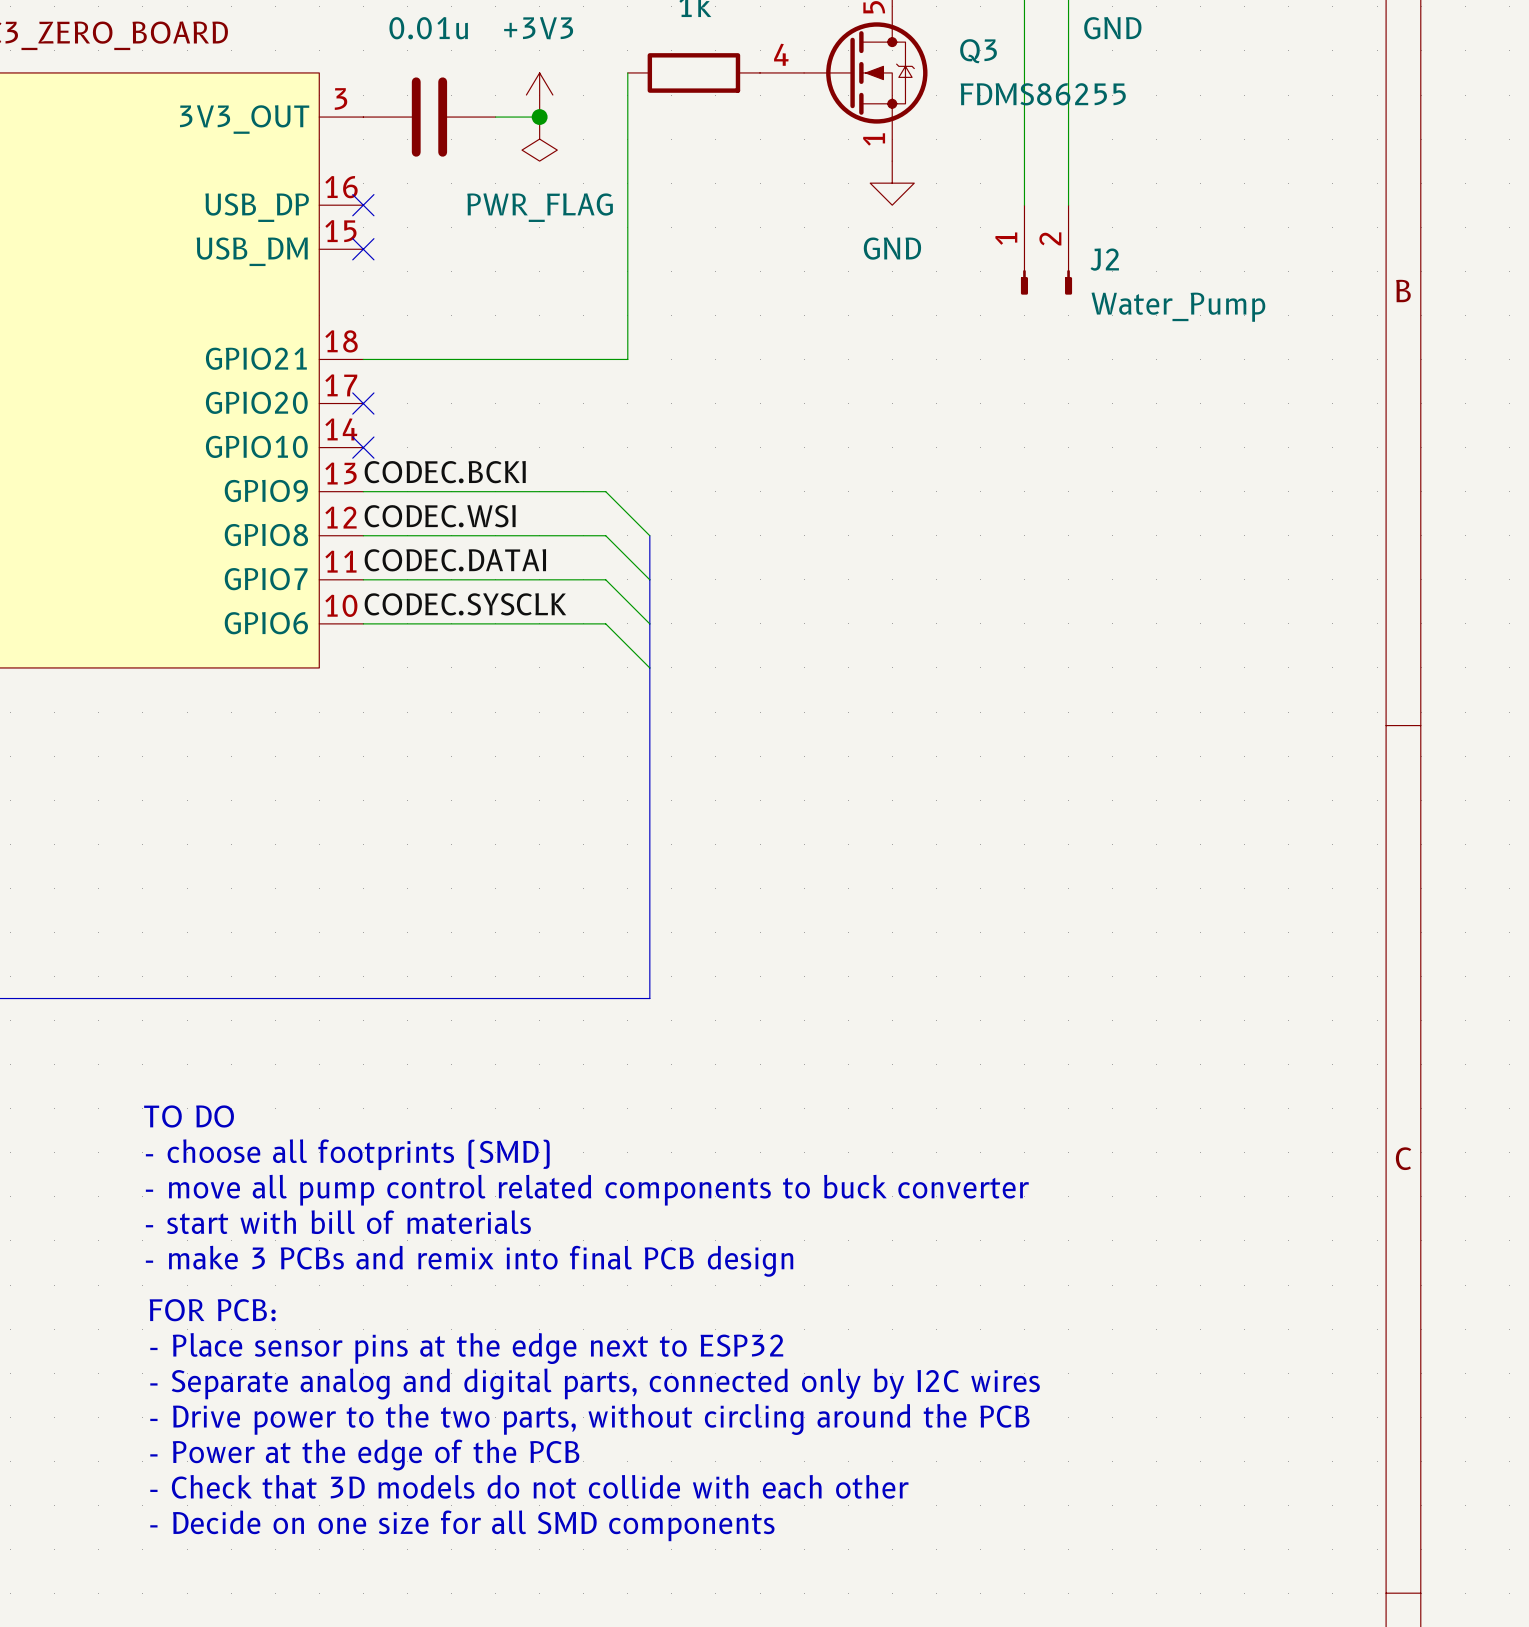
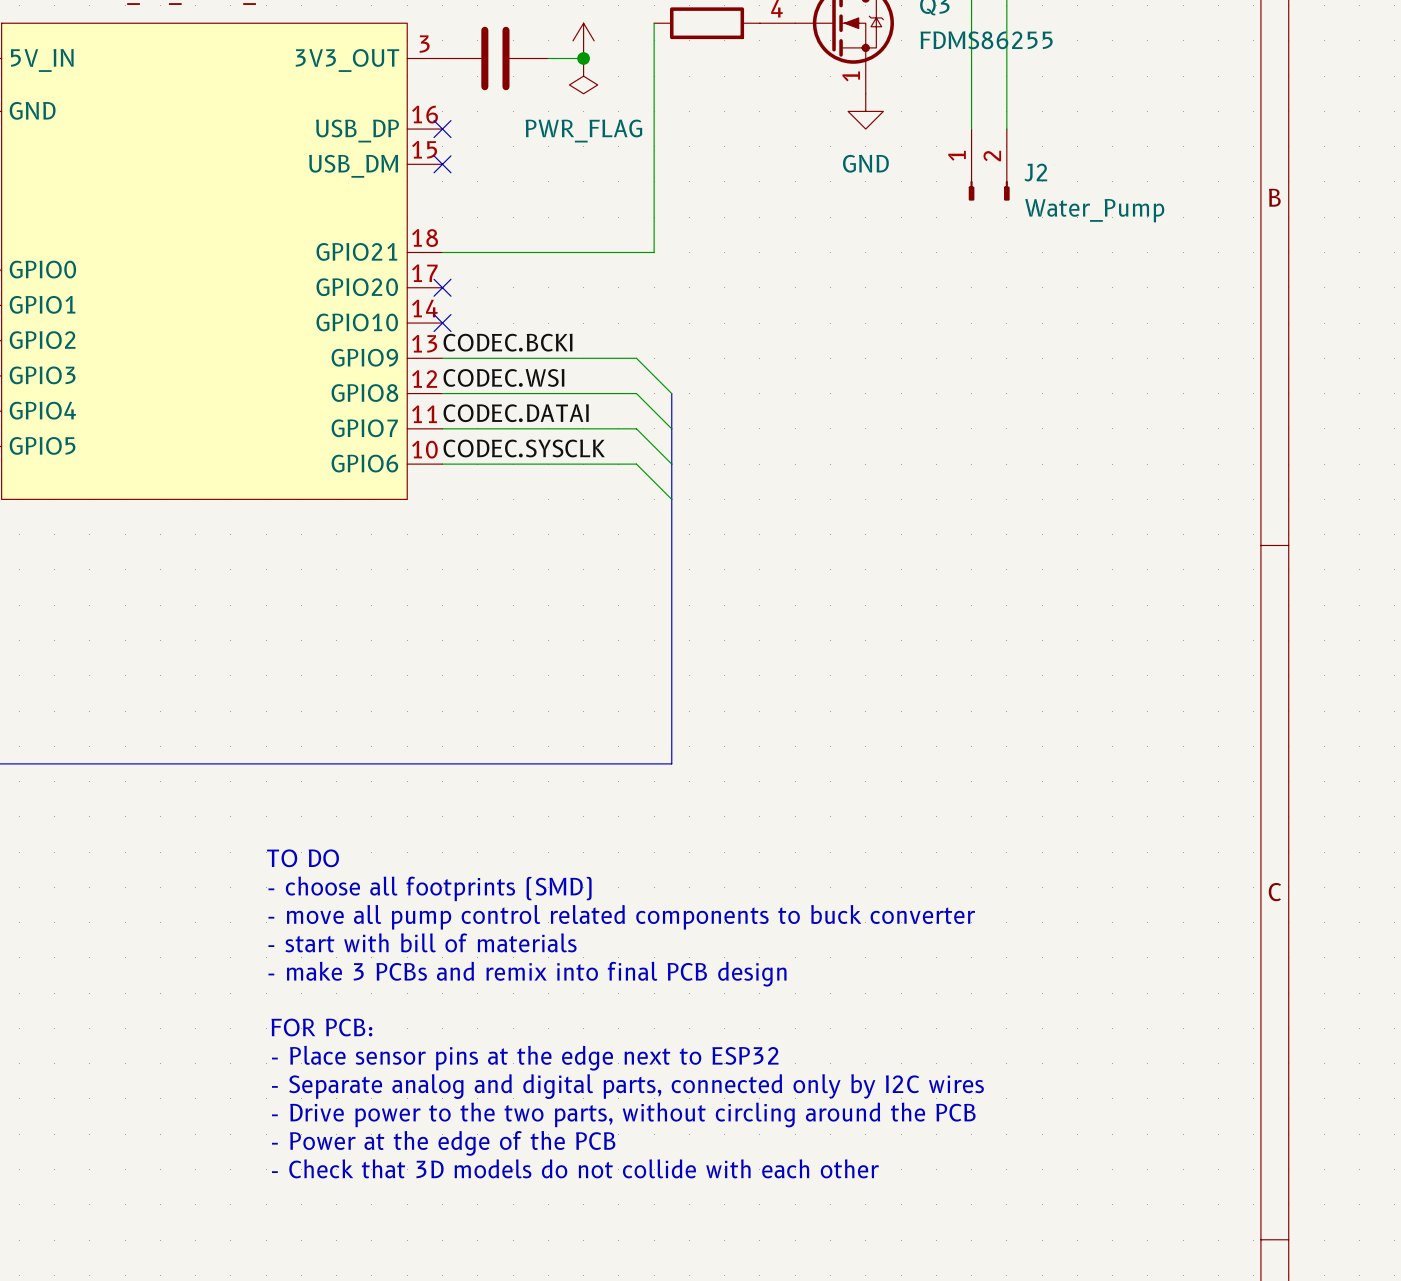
text position: FOR PCB: (212, 1310) -> FOR PCB: (321, 1027)
text position: - Place sensor pins at the edge next to ESP32 (466, 1348) -> - Place sensor pins at the edge next to ESP32 (525, 1058)
text position: - Separate analog and digital parts, connected only by I2C wires (595, 1384) -> - Separate analog and digital parts, connected only by I2C wires (627, 1086)
text position: - Drive power to the two parts, without circling around the PCB (589, 1419) -> - Drive power to the two parts, without circling around the PCB (623, 1114)
text position: - Power at the edge of the PCB (364, 1454) -> - Power at the edge of the PCB (443, 1143)
text position: - Check that 3D models do not collide with each other (529, 1486) -> - Check that 3D models do not collide with each other (575, 1168)
text: - Decide on one size for all SMD components (462, 1525) -> none

